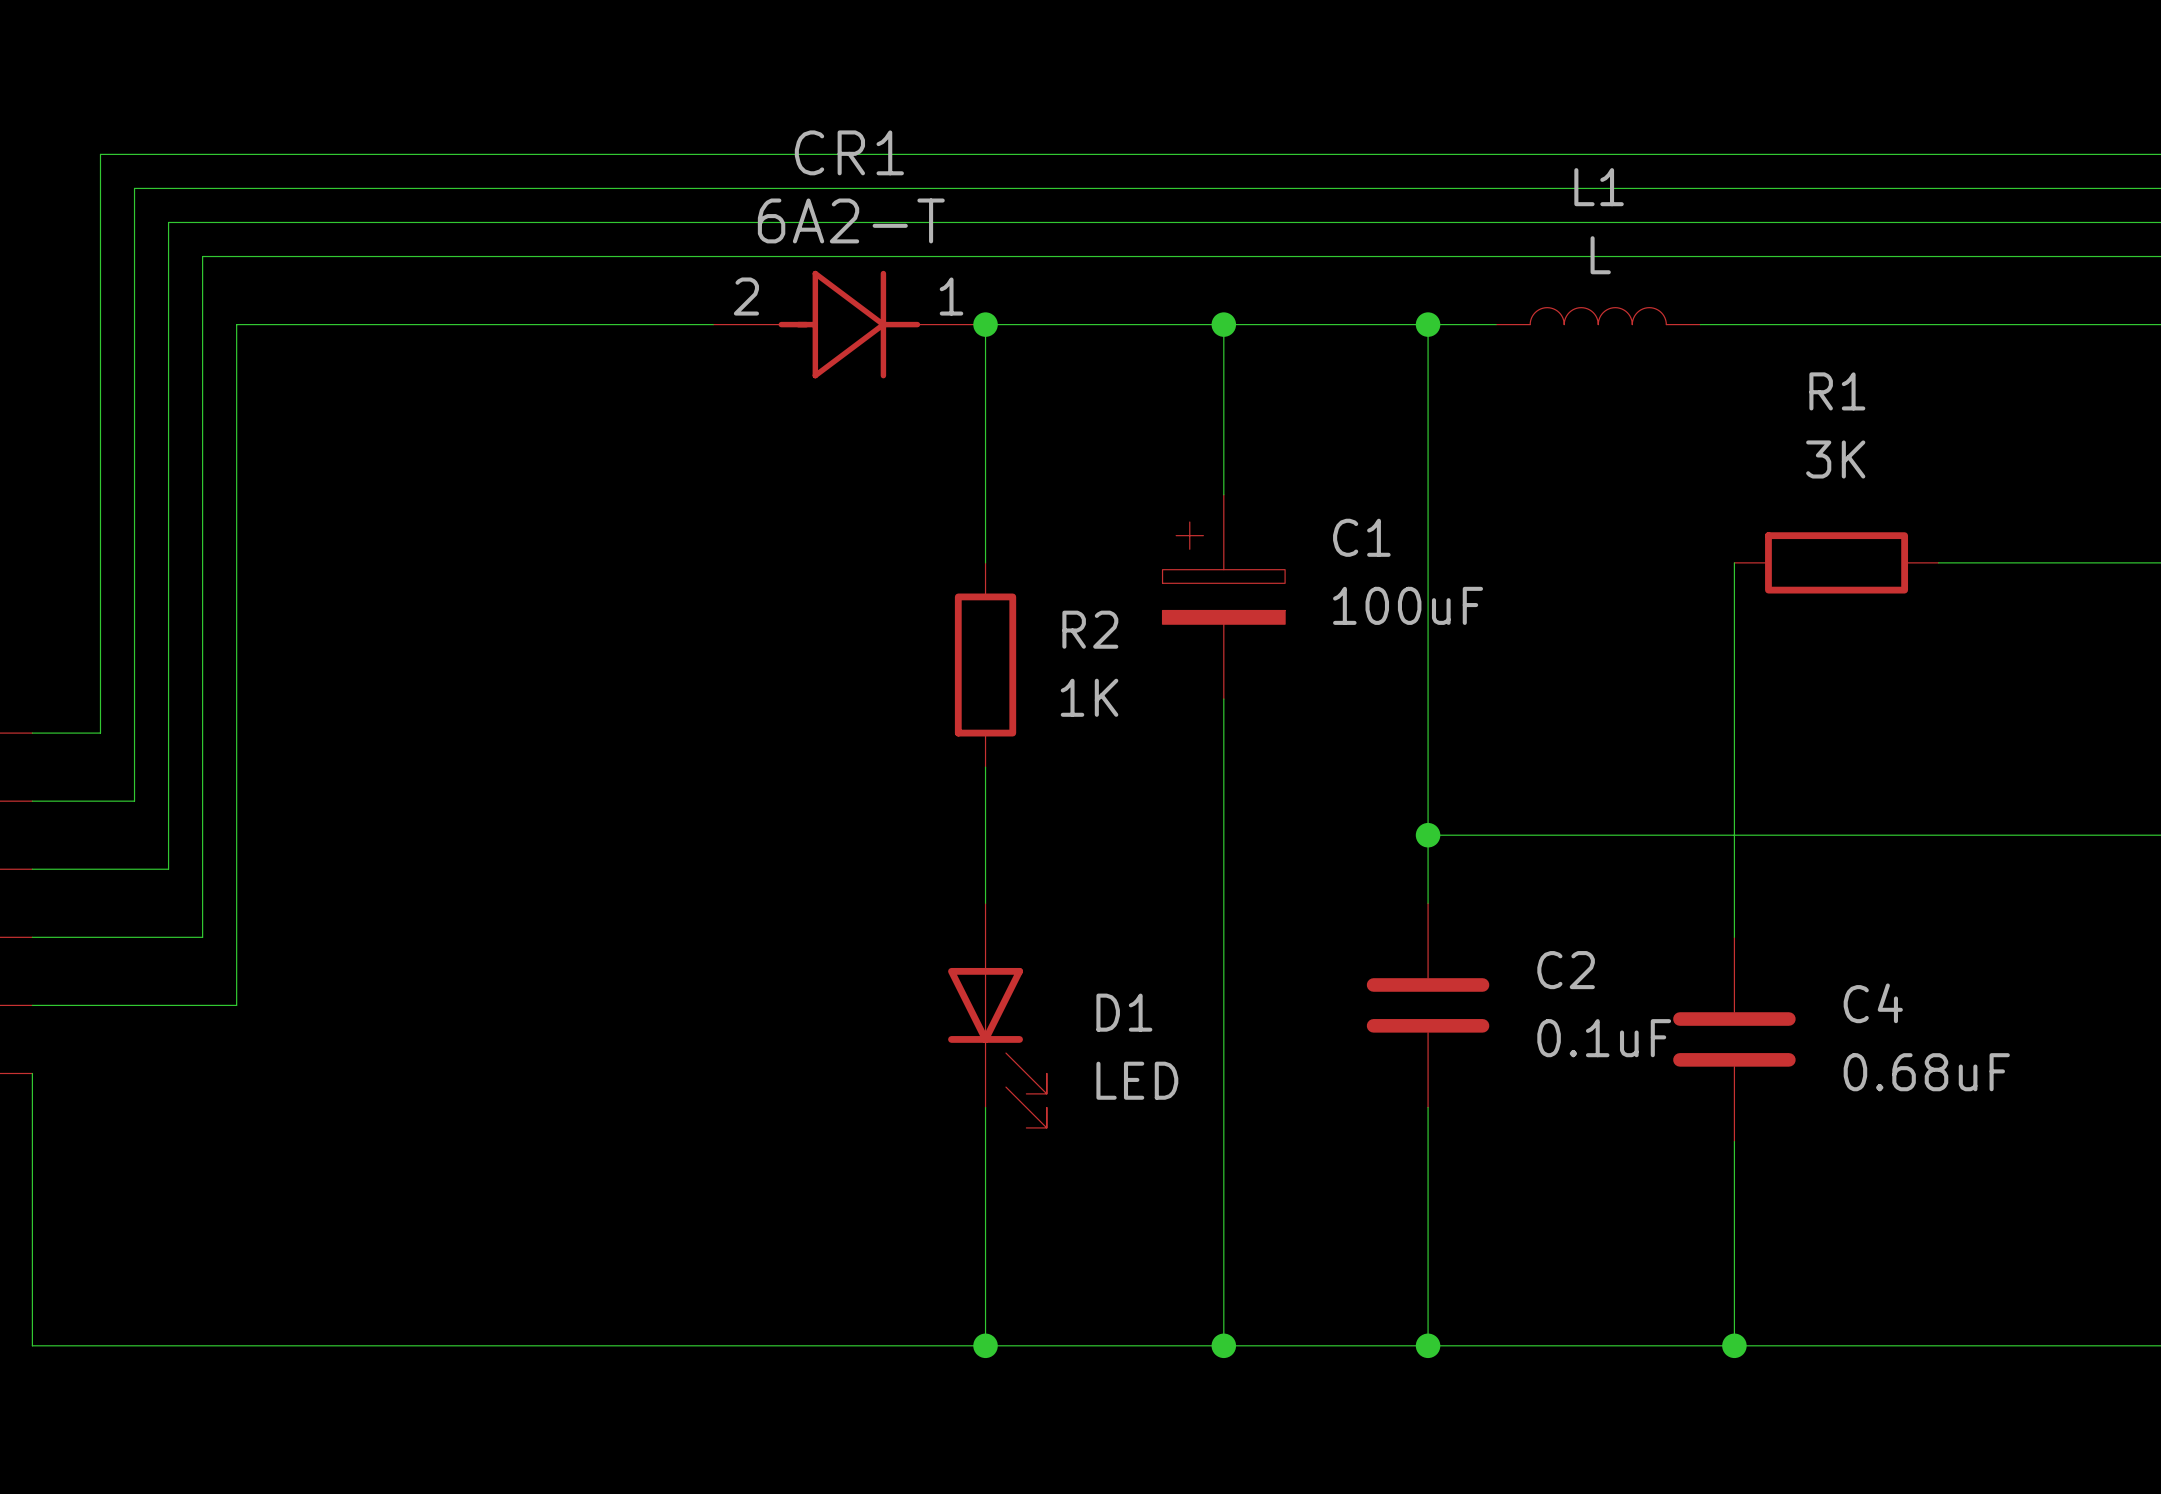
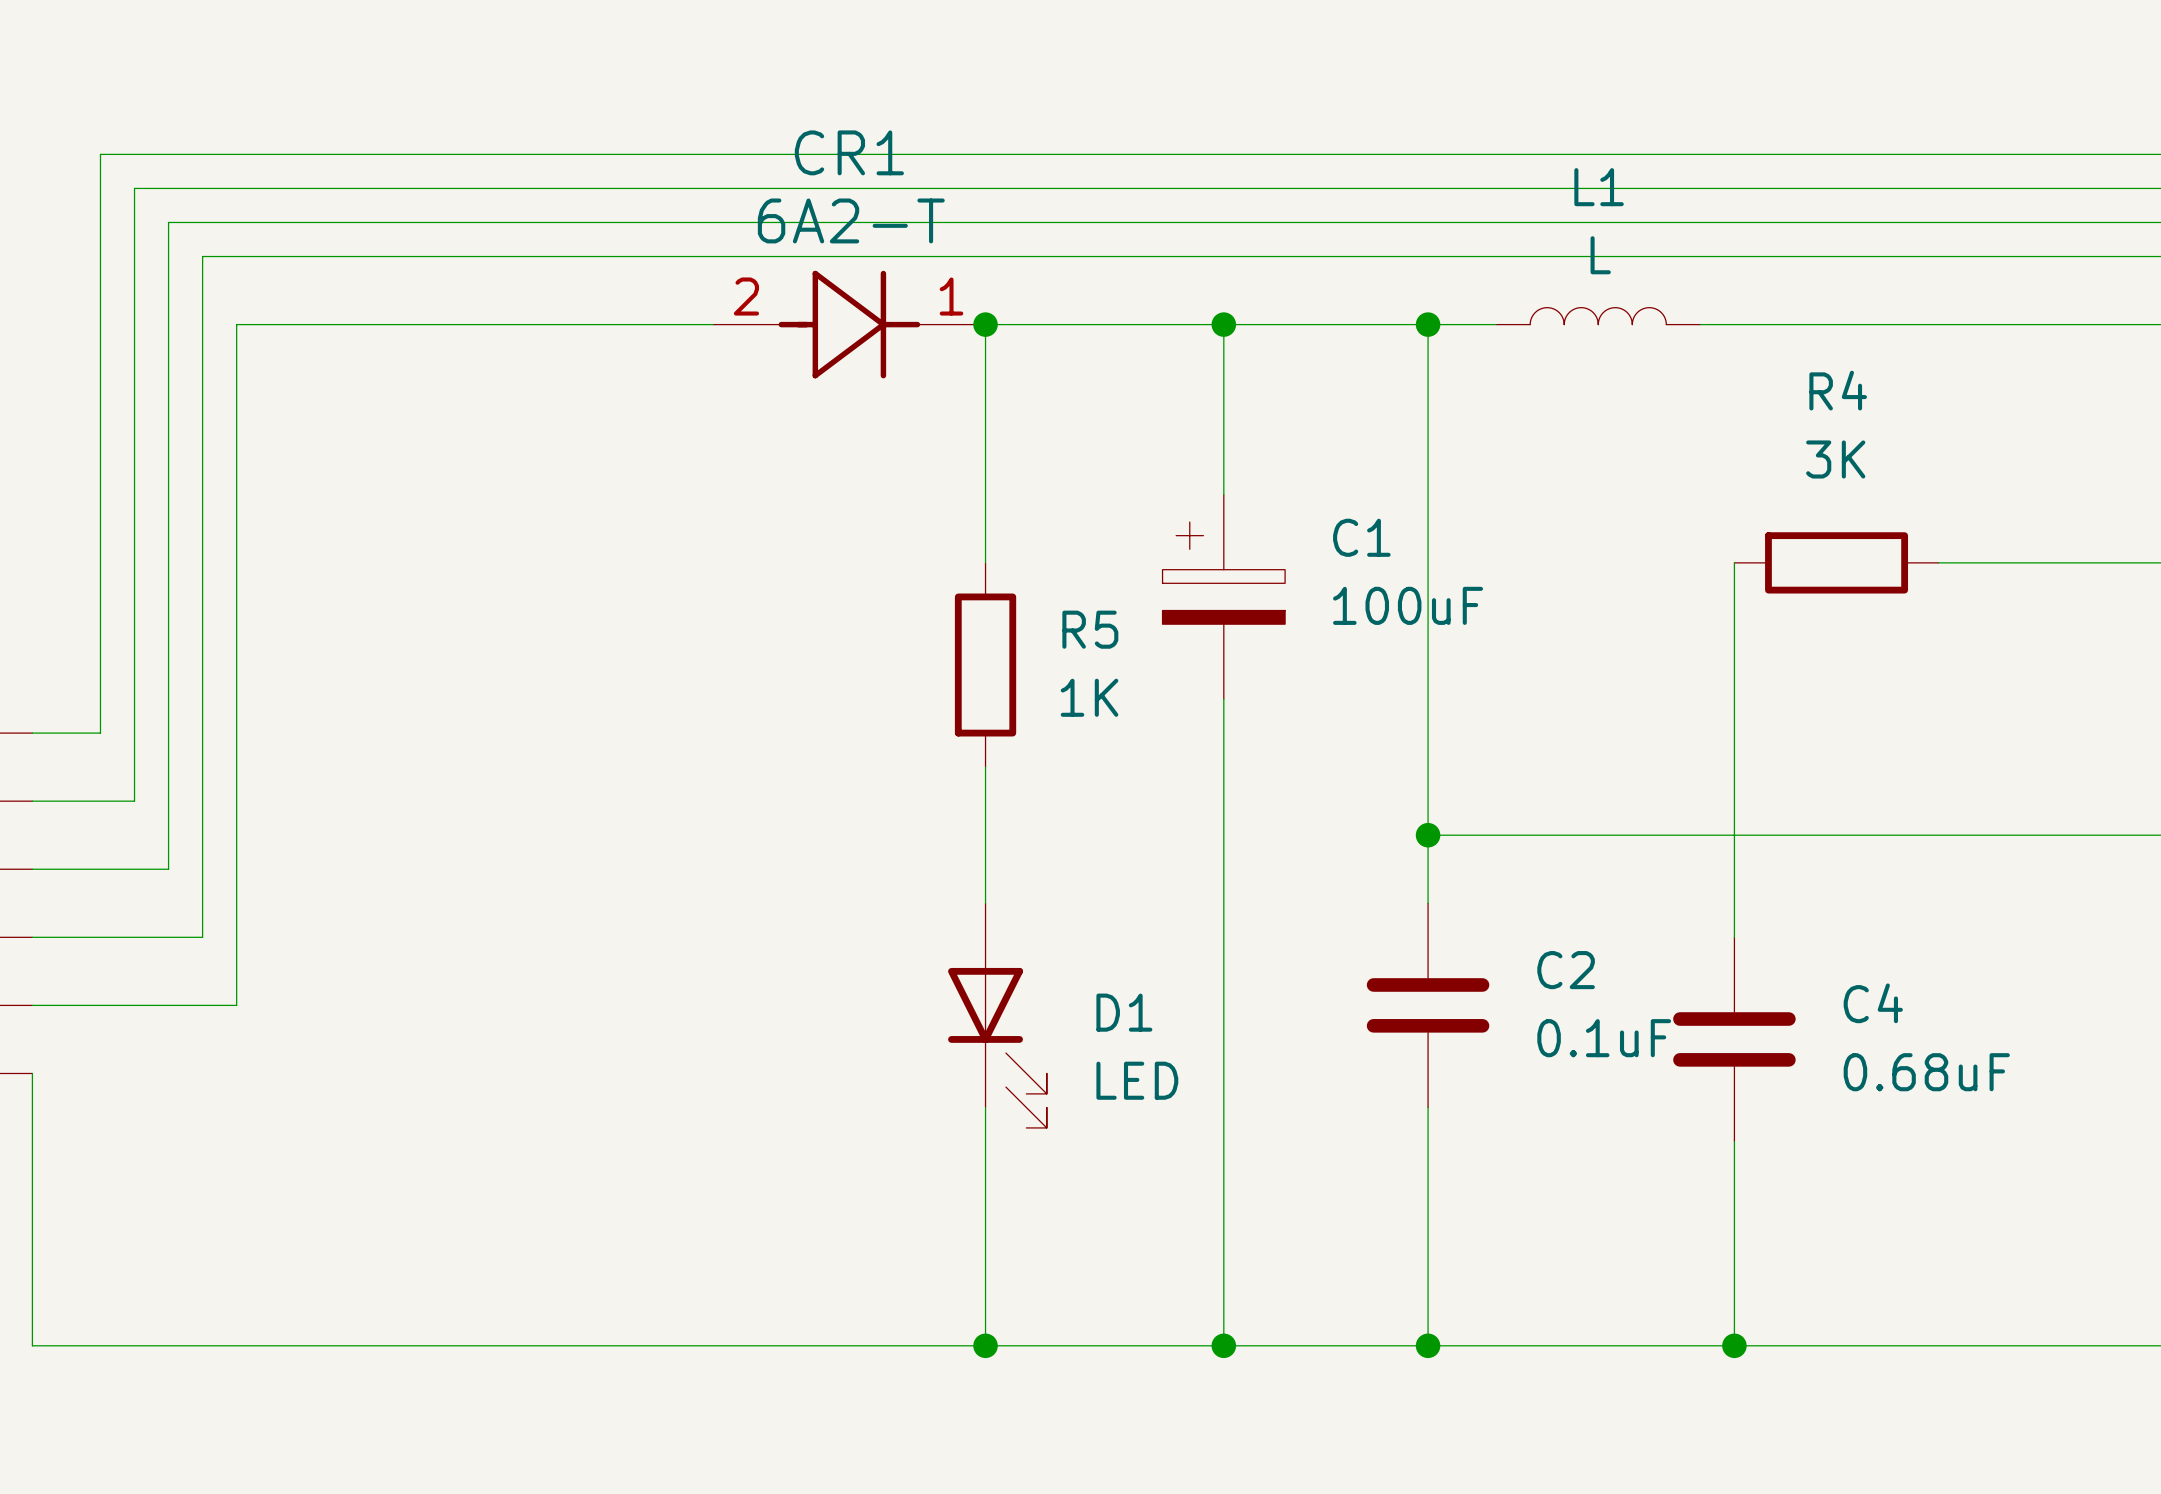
R1 name: R1 (1837, 391) -> R4 (1838, 390)
R2 name: R2 (1090, 629) -> R5 (1090, 629)

